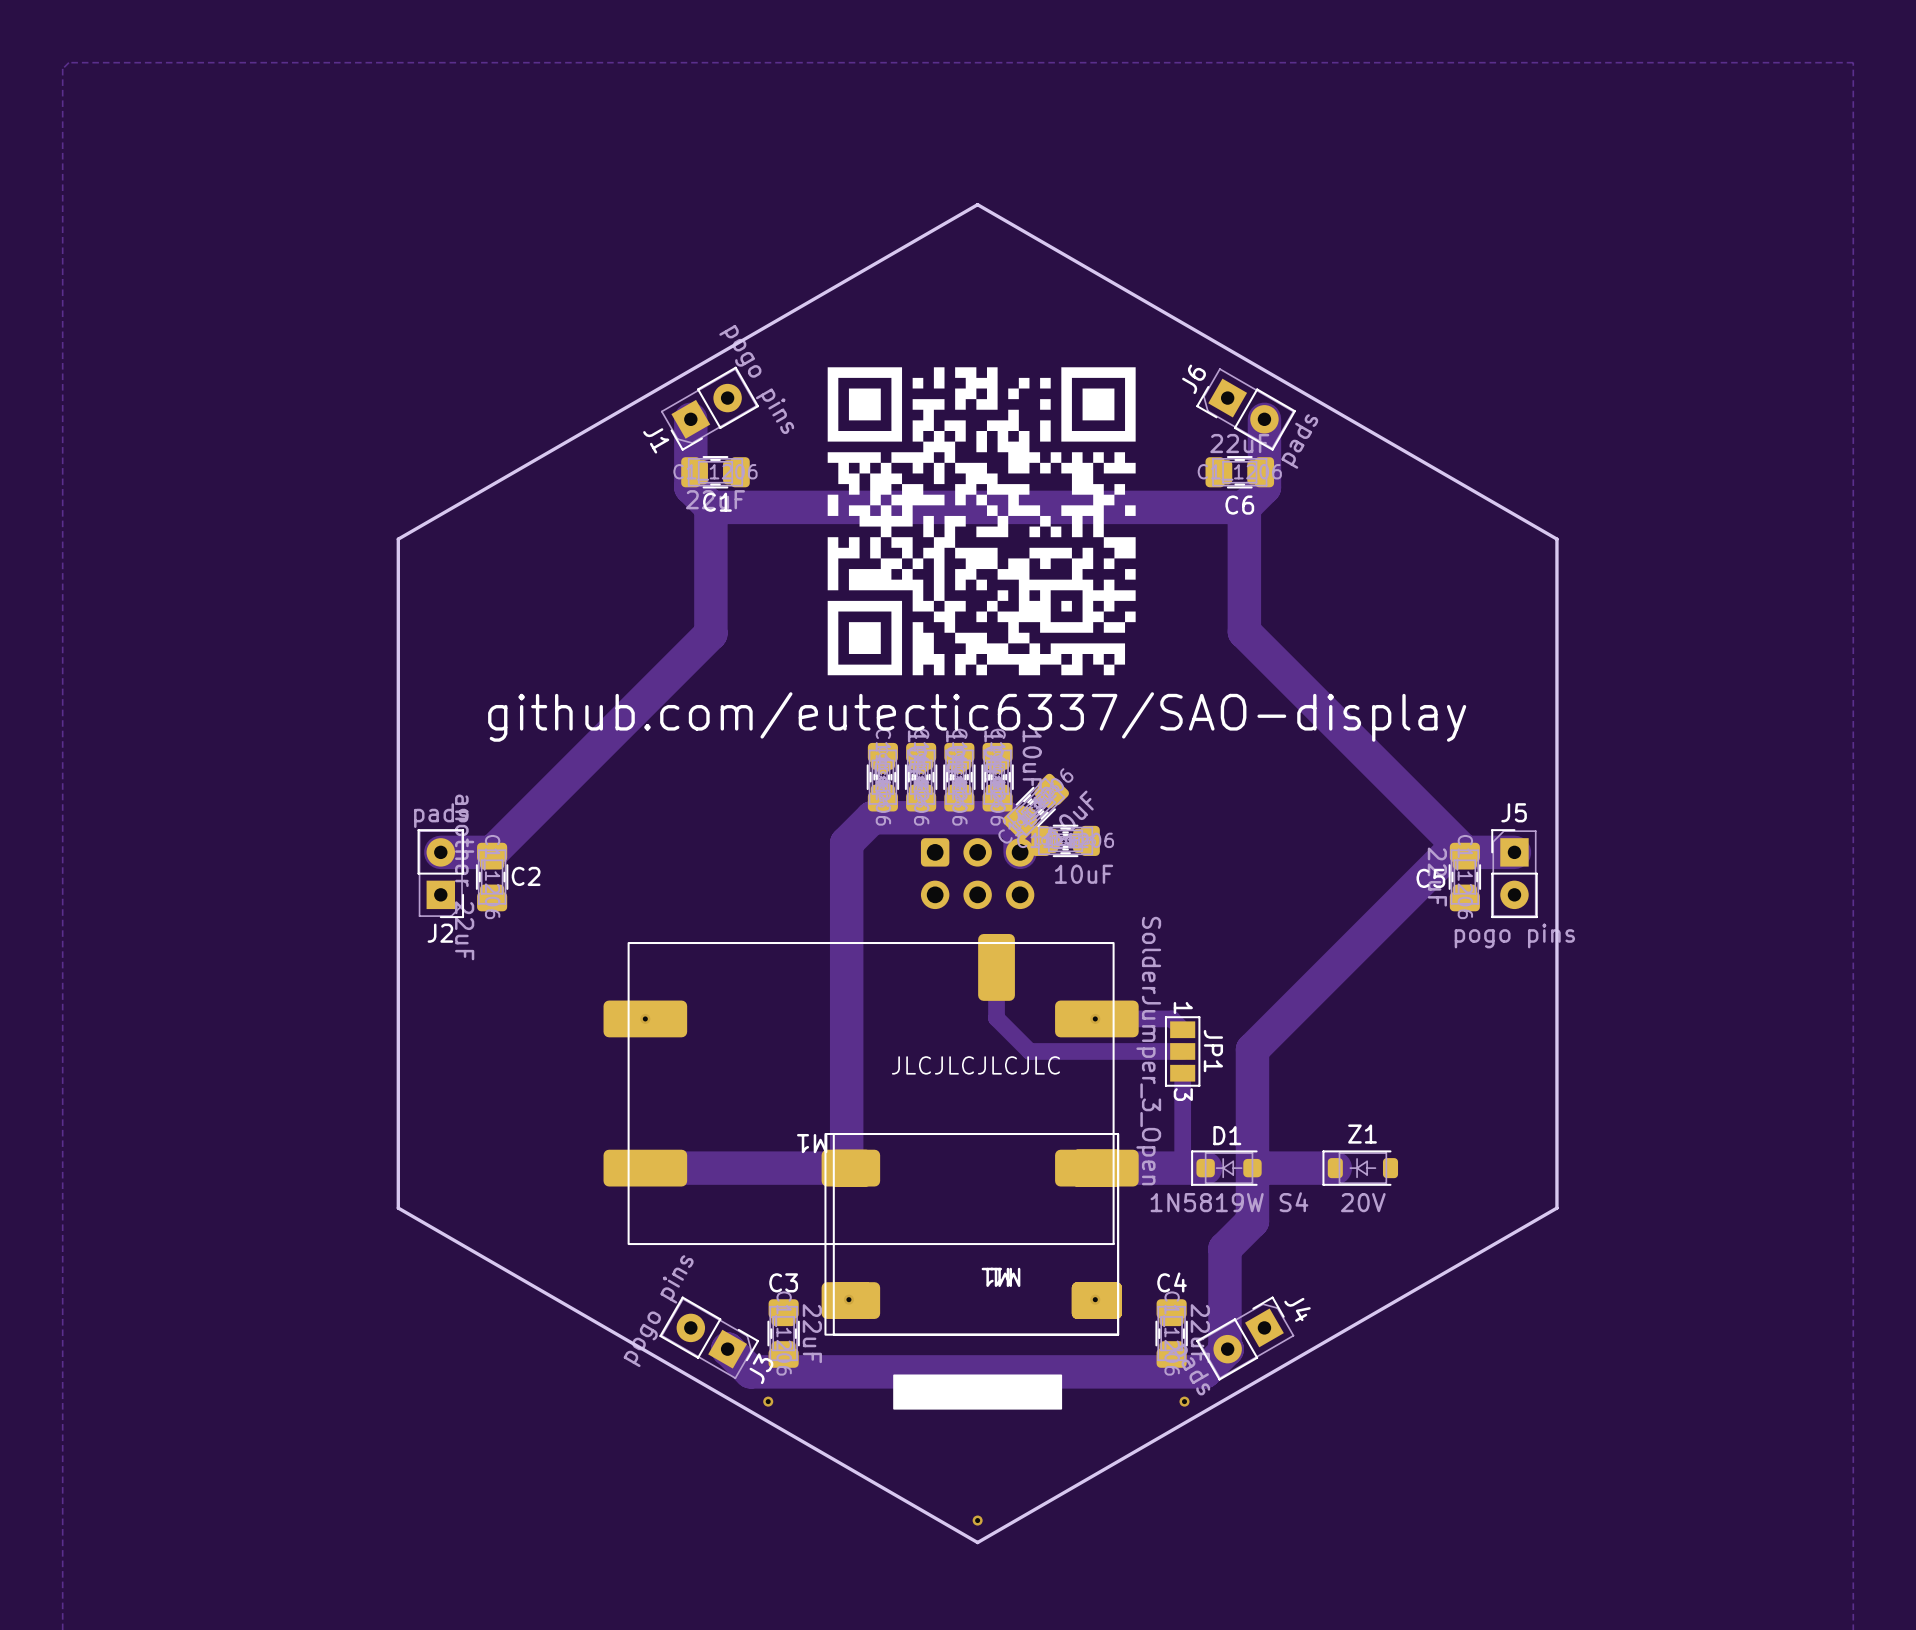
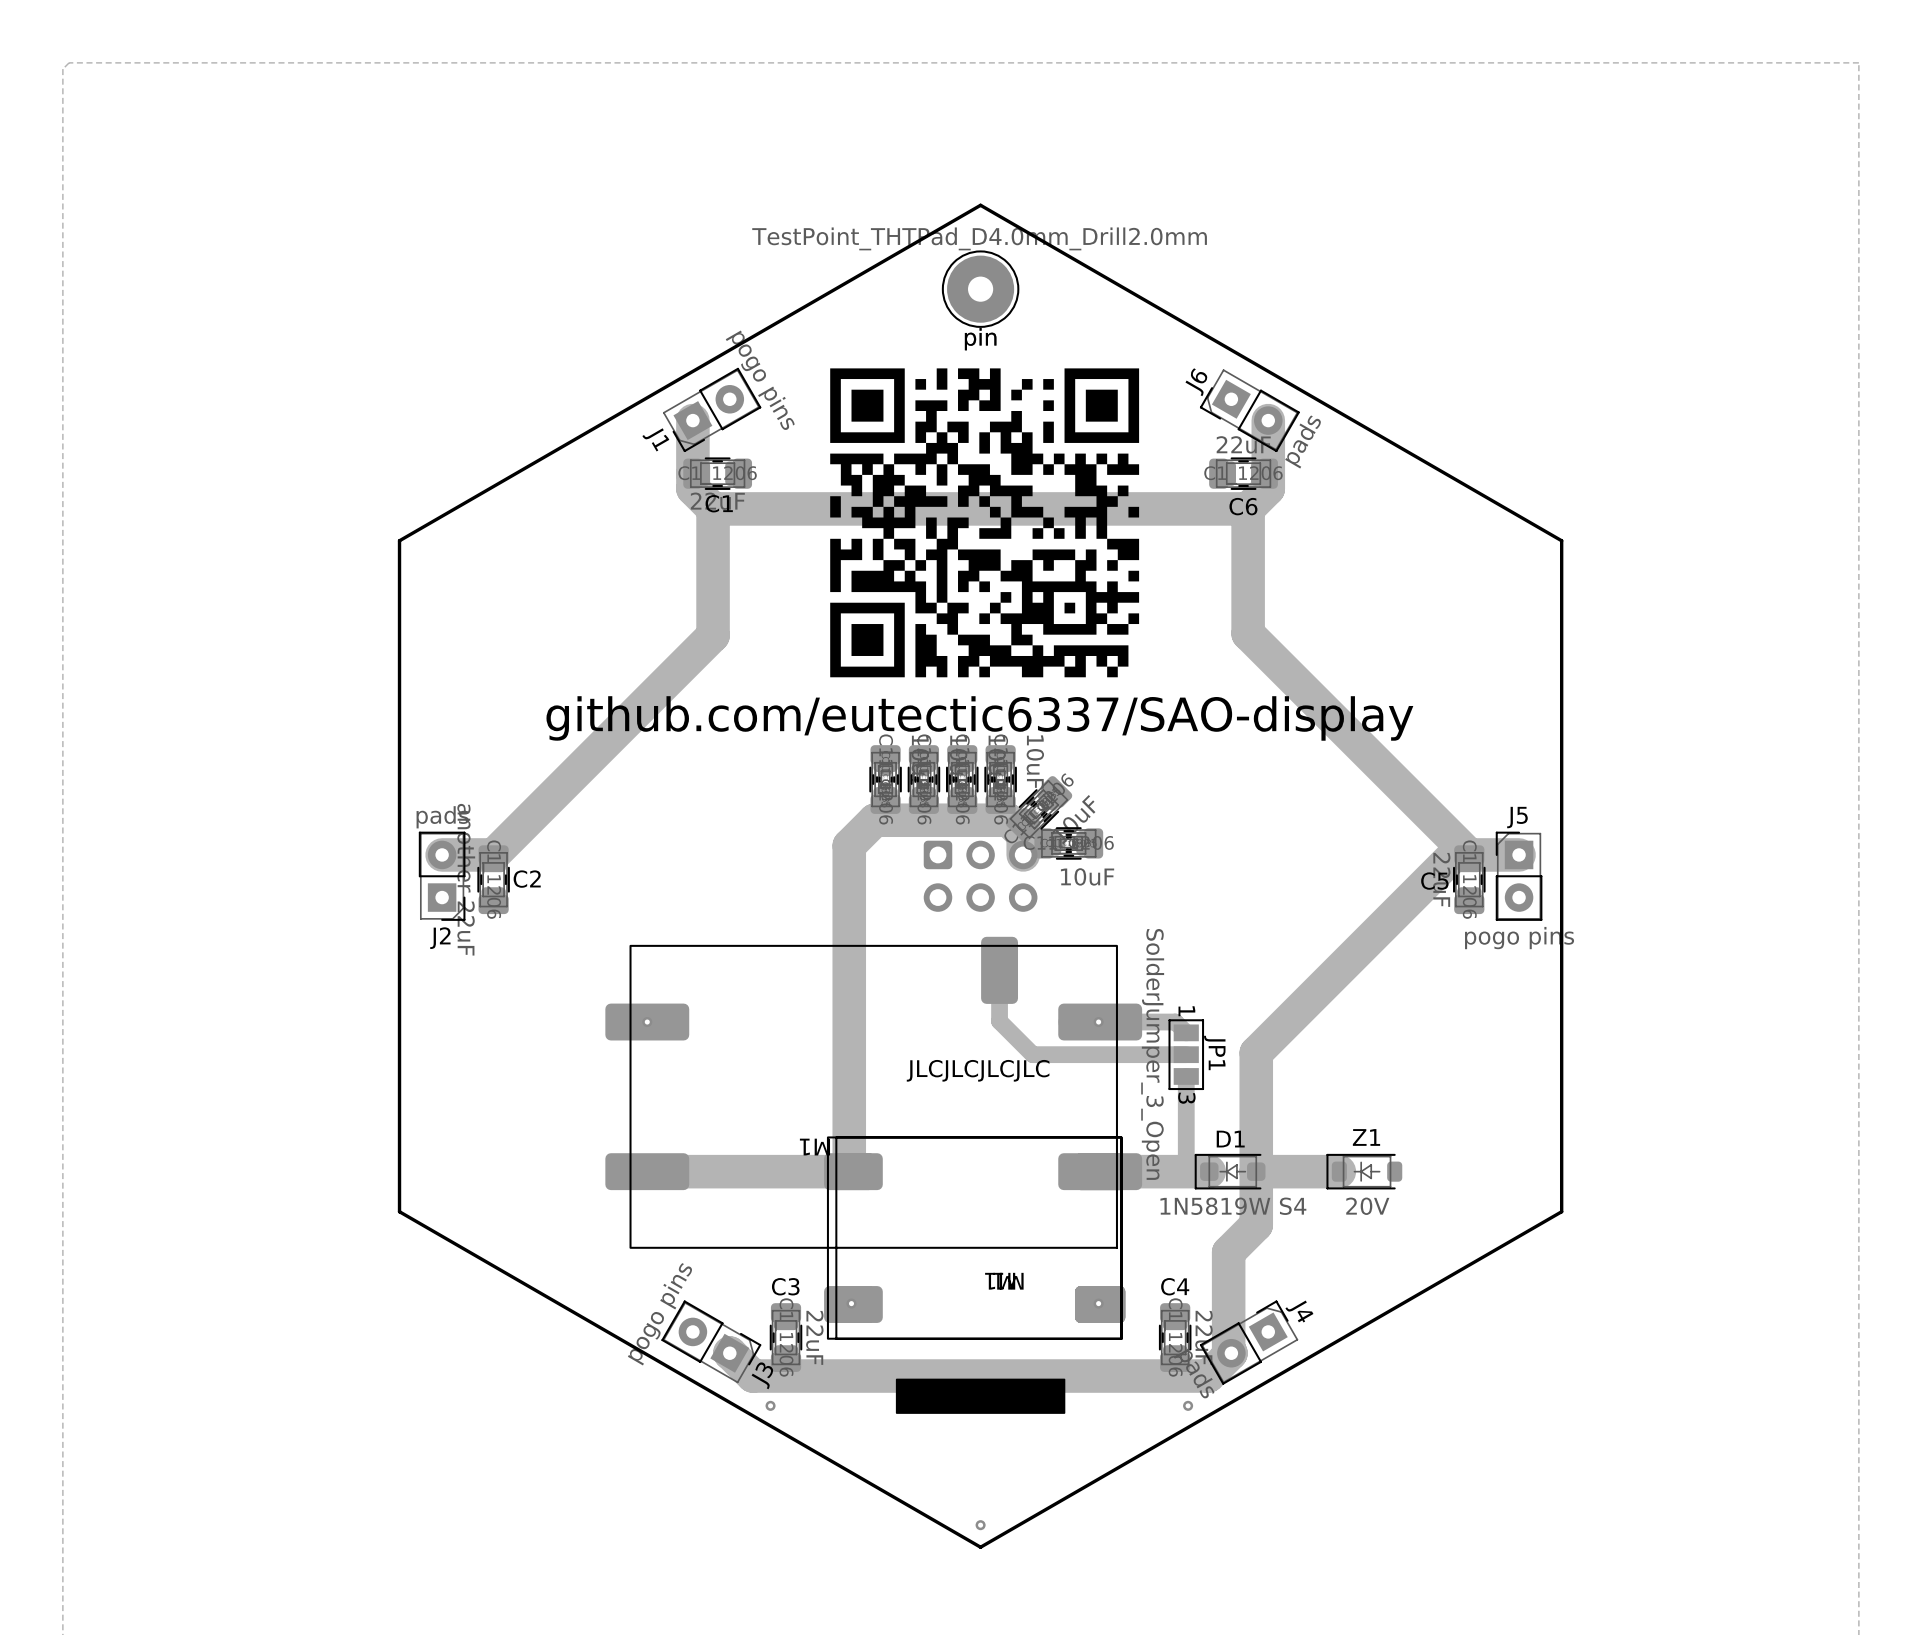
pin: none -> TestPoint_THTPad_D4.0mm_Drill2.0mm (980, 289)

